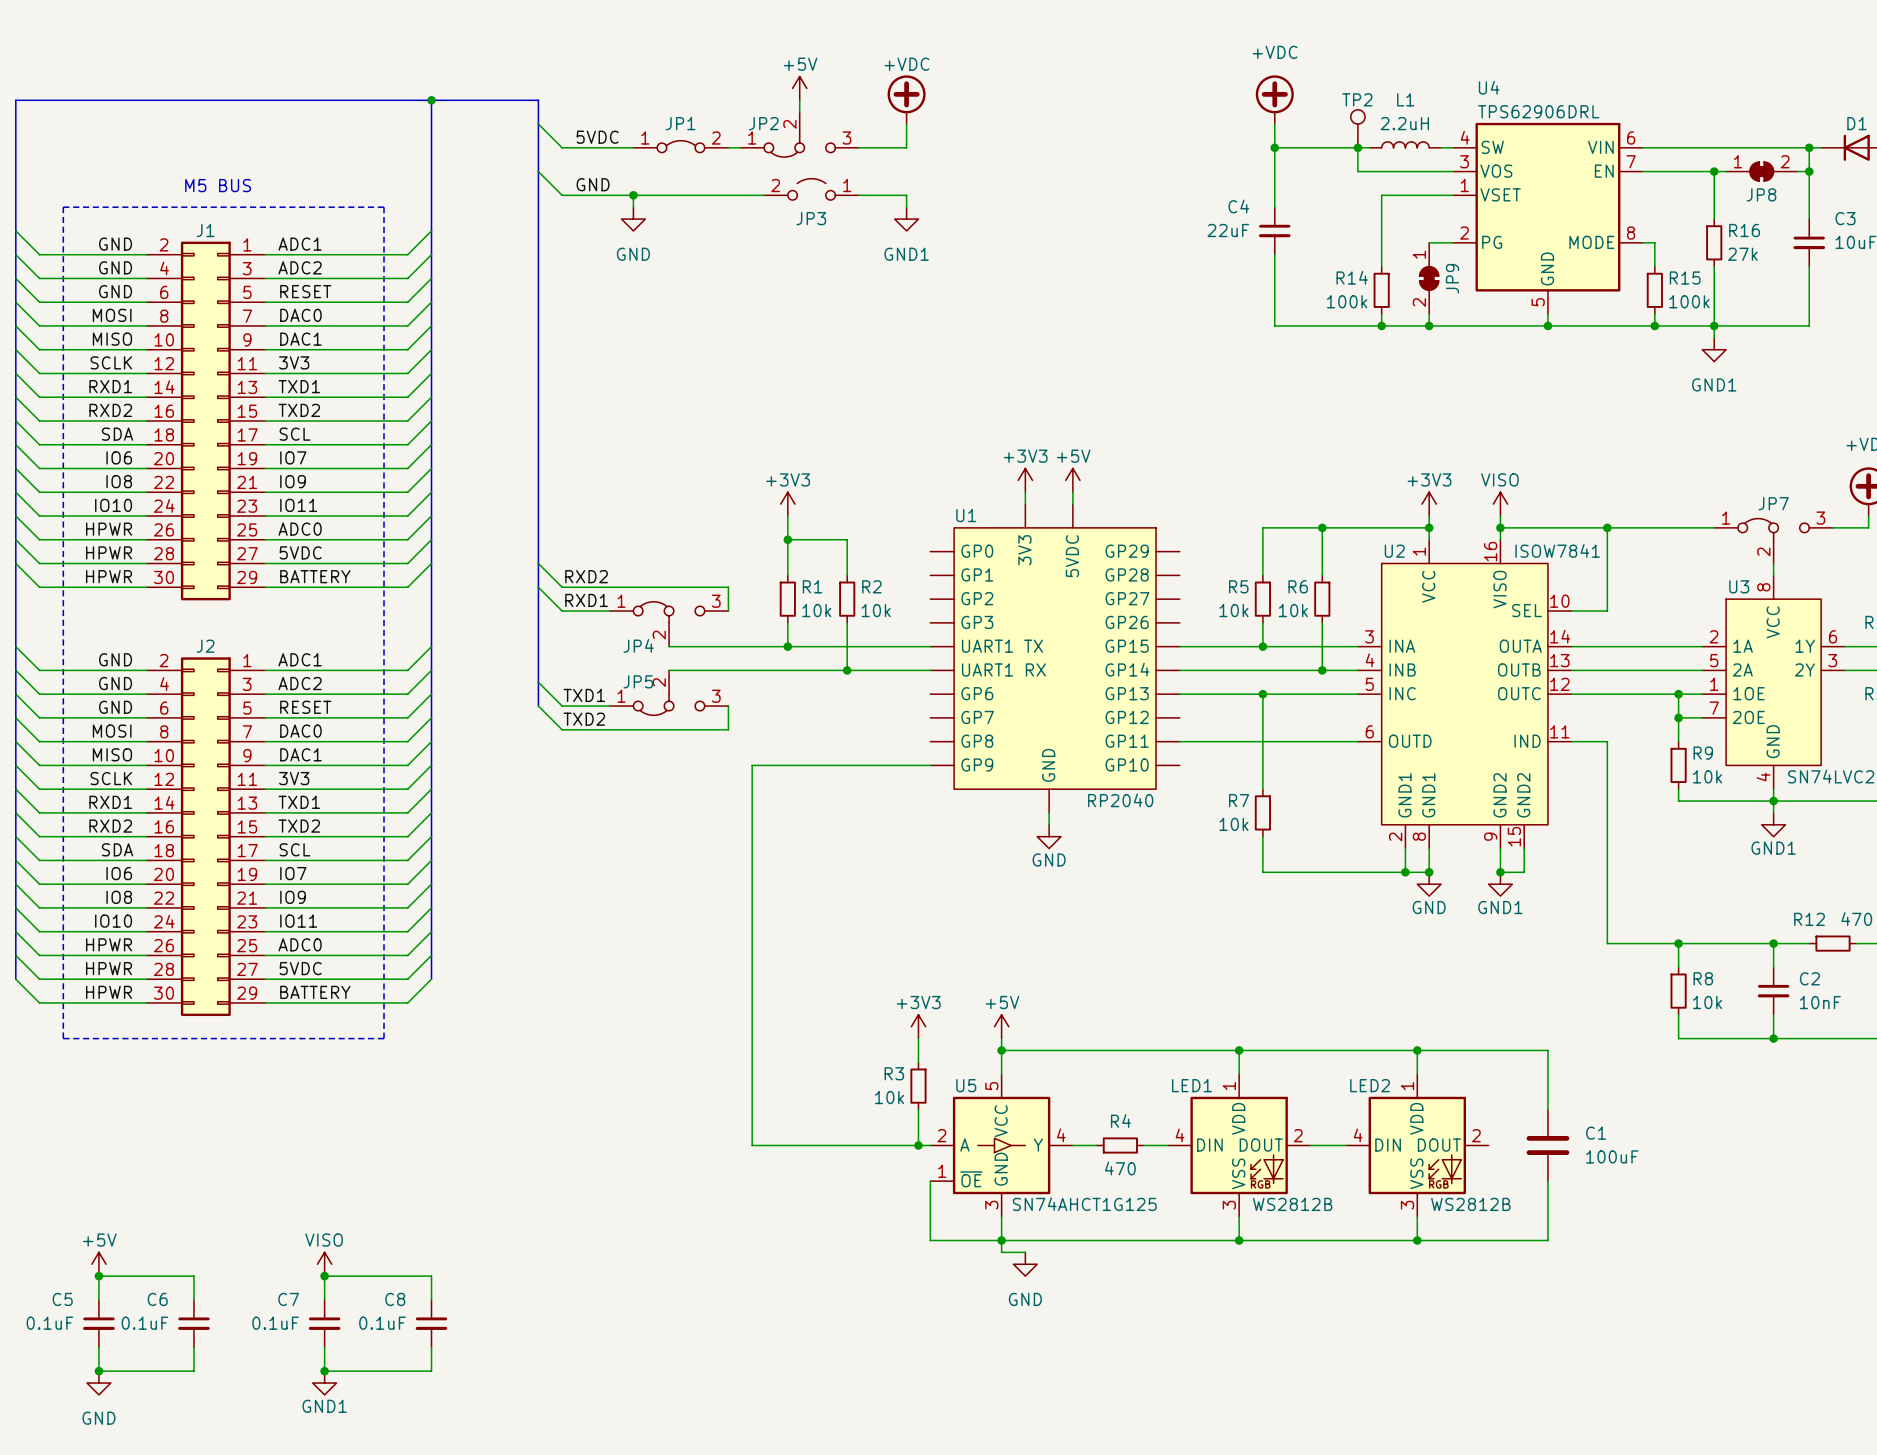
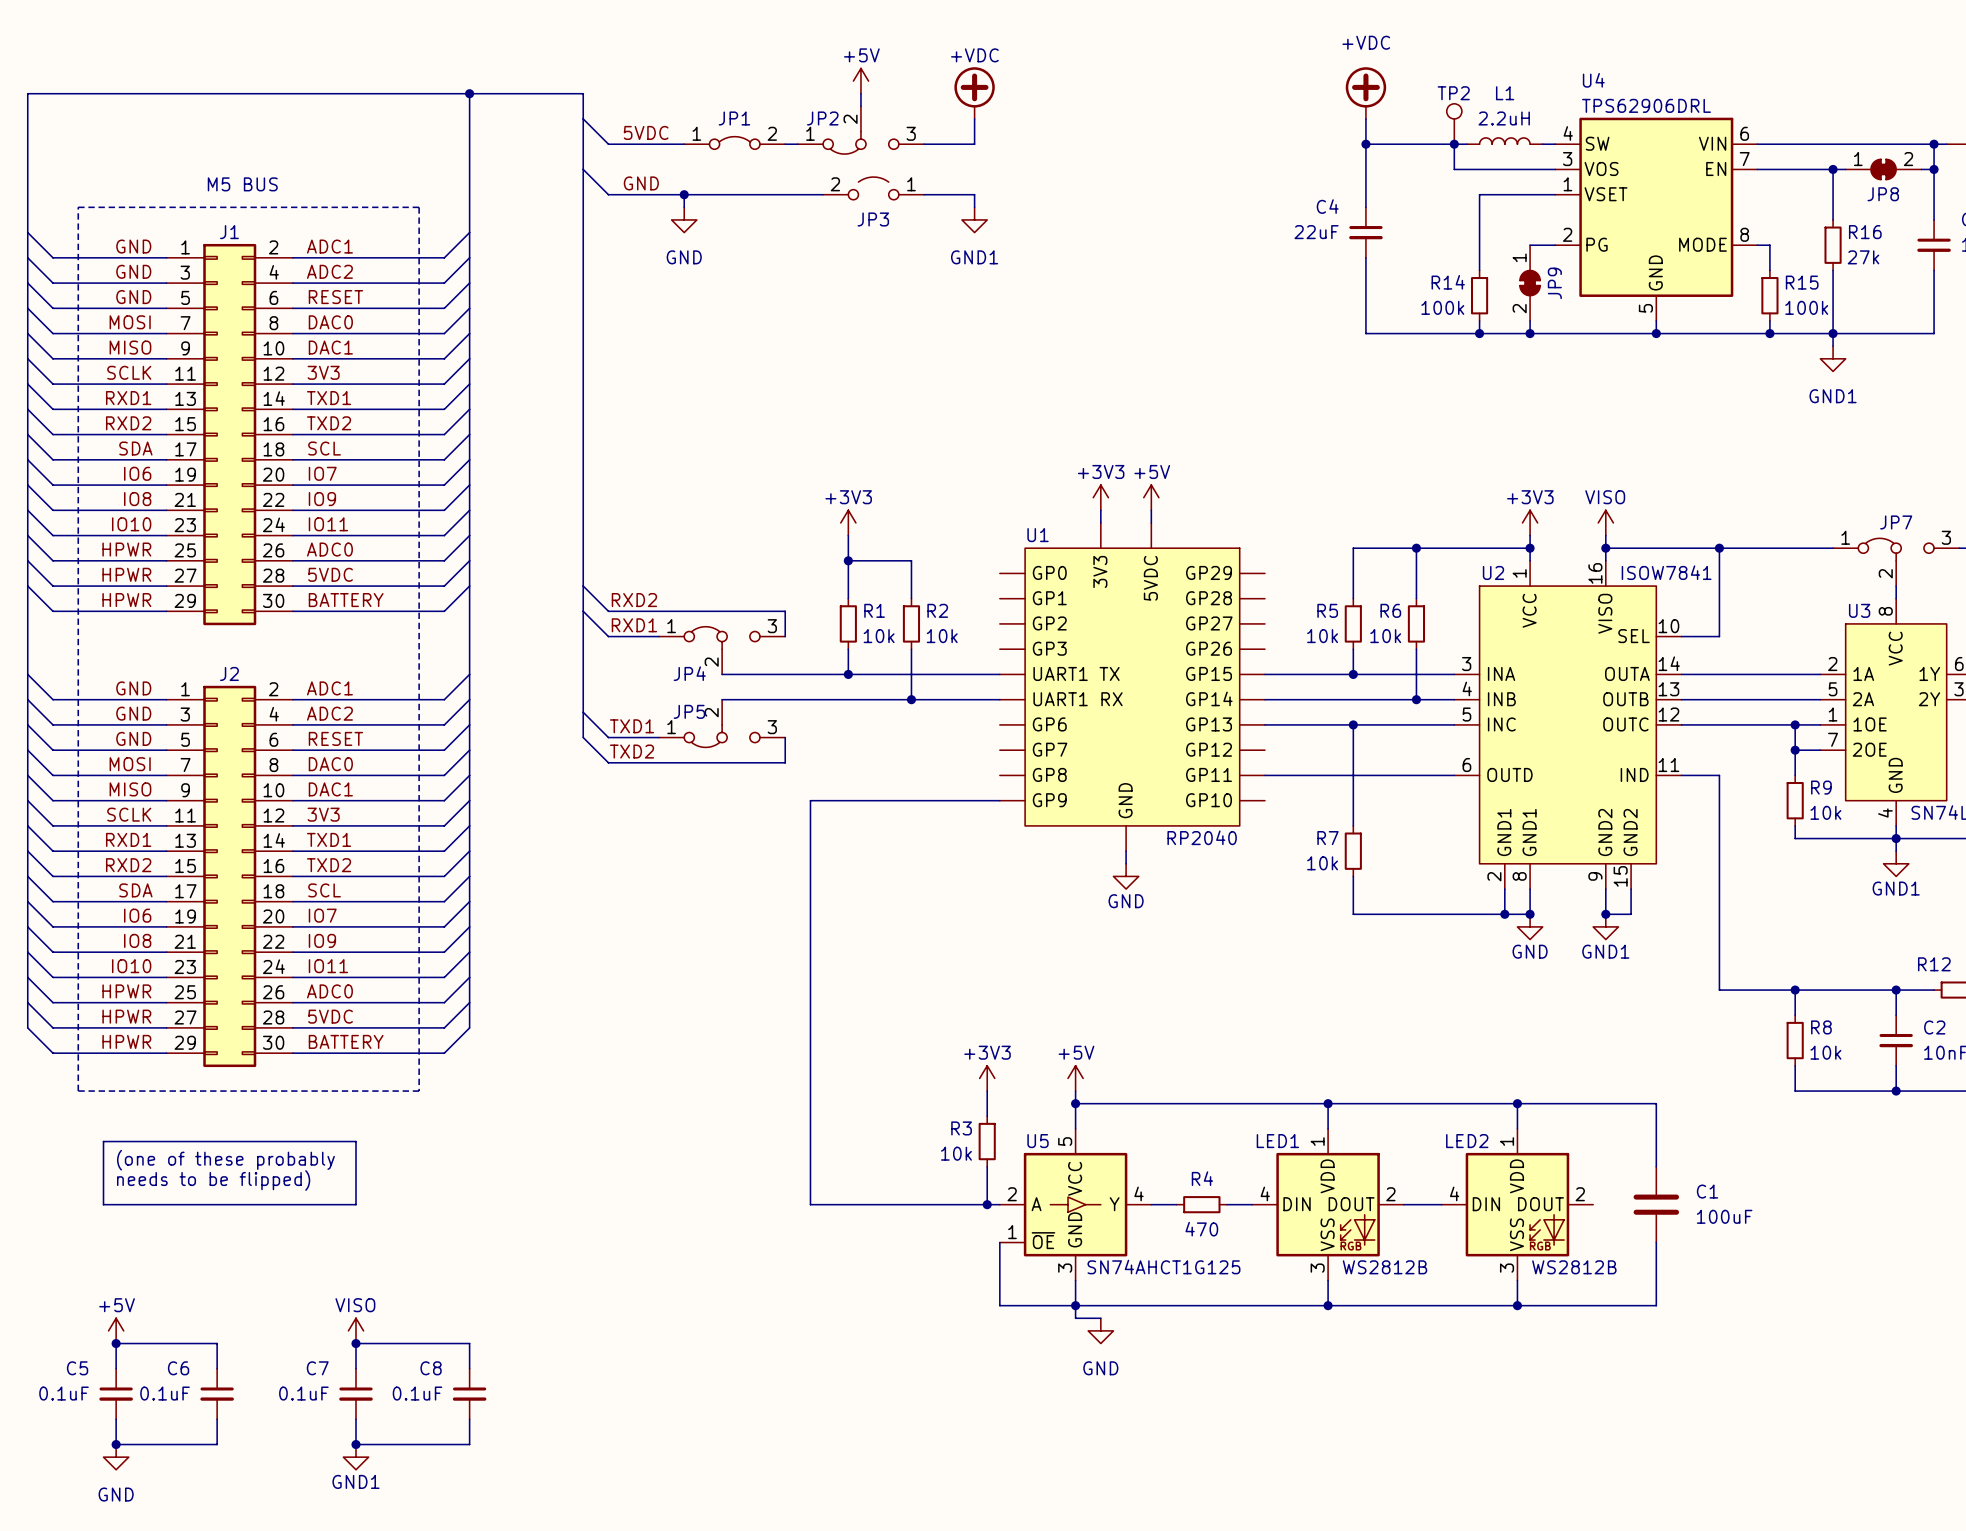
J1 flip: as is (205, 420) -> left-right (229, 434)
J2 flip: as is (205, 836) -> left-right (229, 876)
line: none -> (103, 1141) (355, 1141) (355, 1204) (103, 1204) (103, 1141)
text: none -> (one of these probably (225, 1160)
text: none -> needs to be flipped) (213, 1180)

